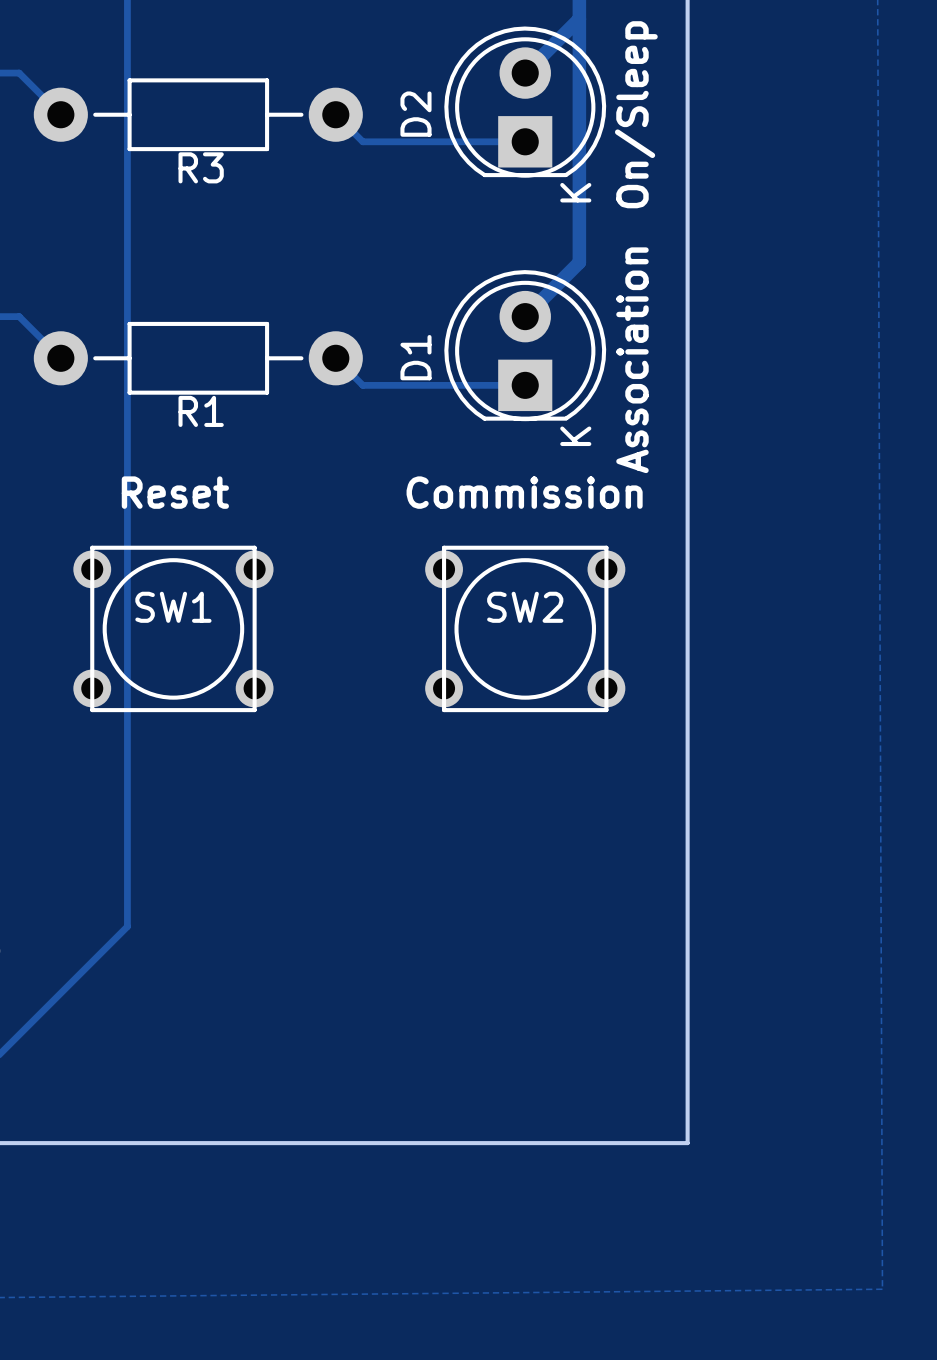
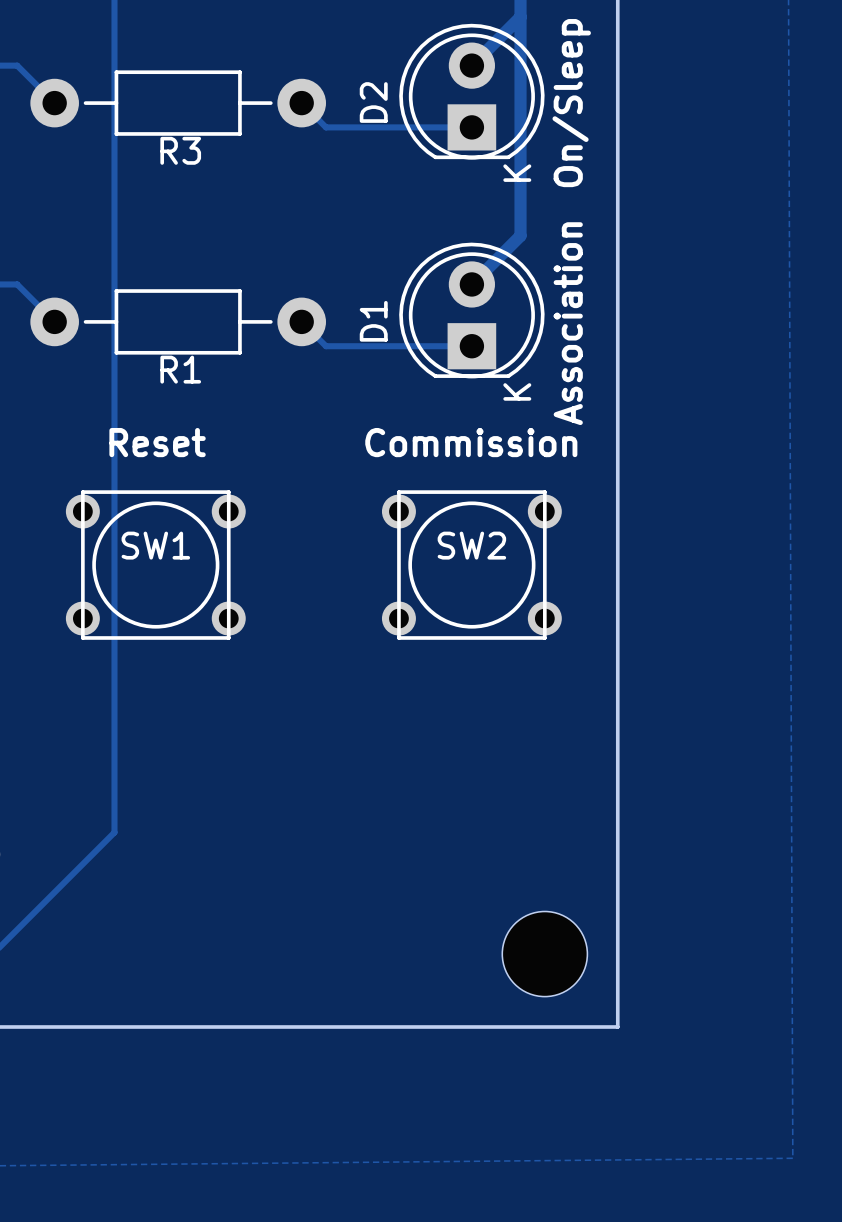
part: none -> (544, 954)

